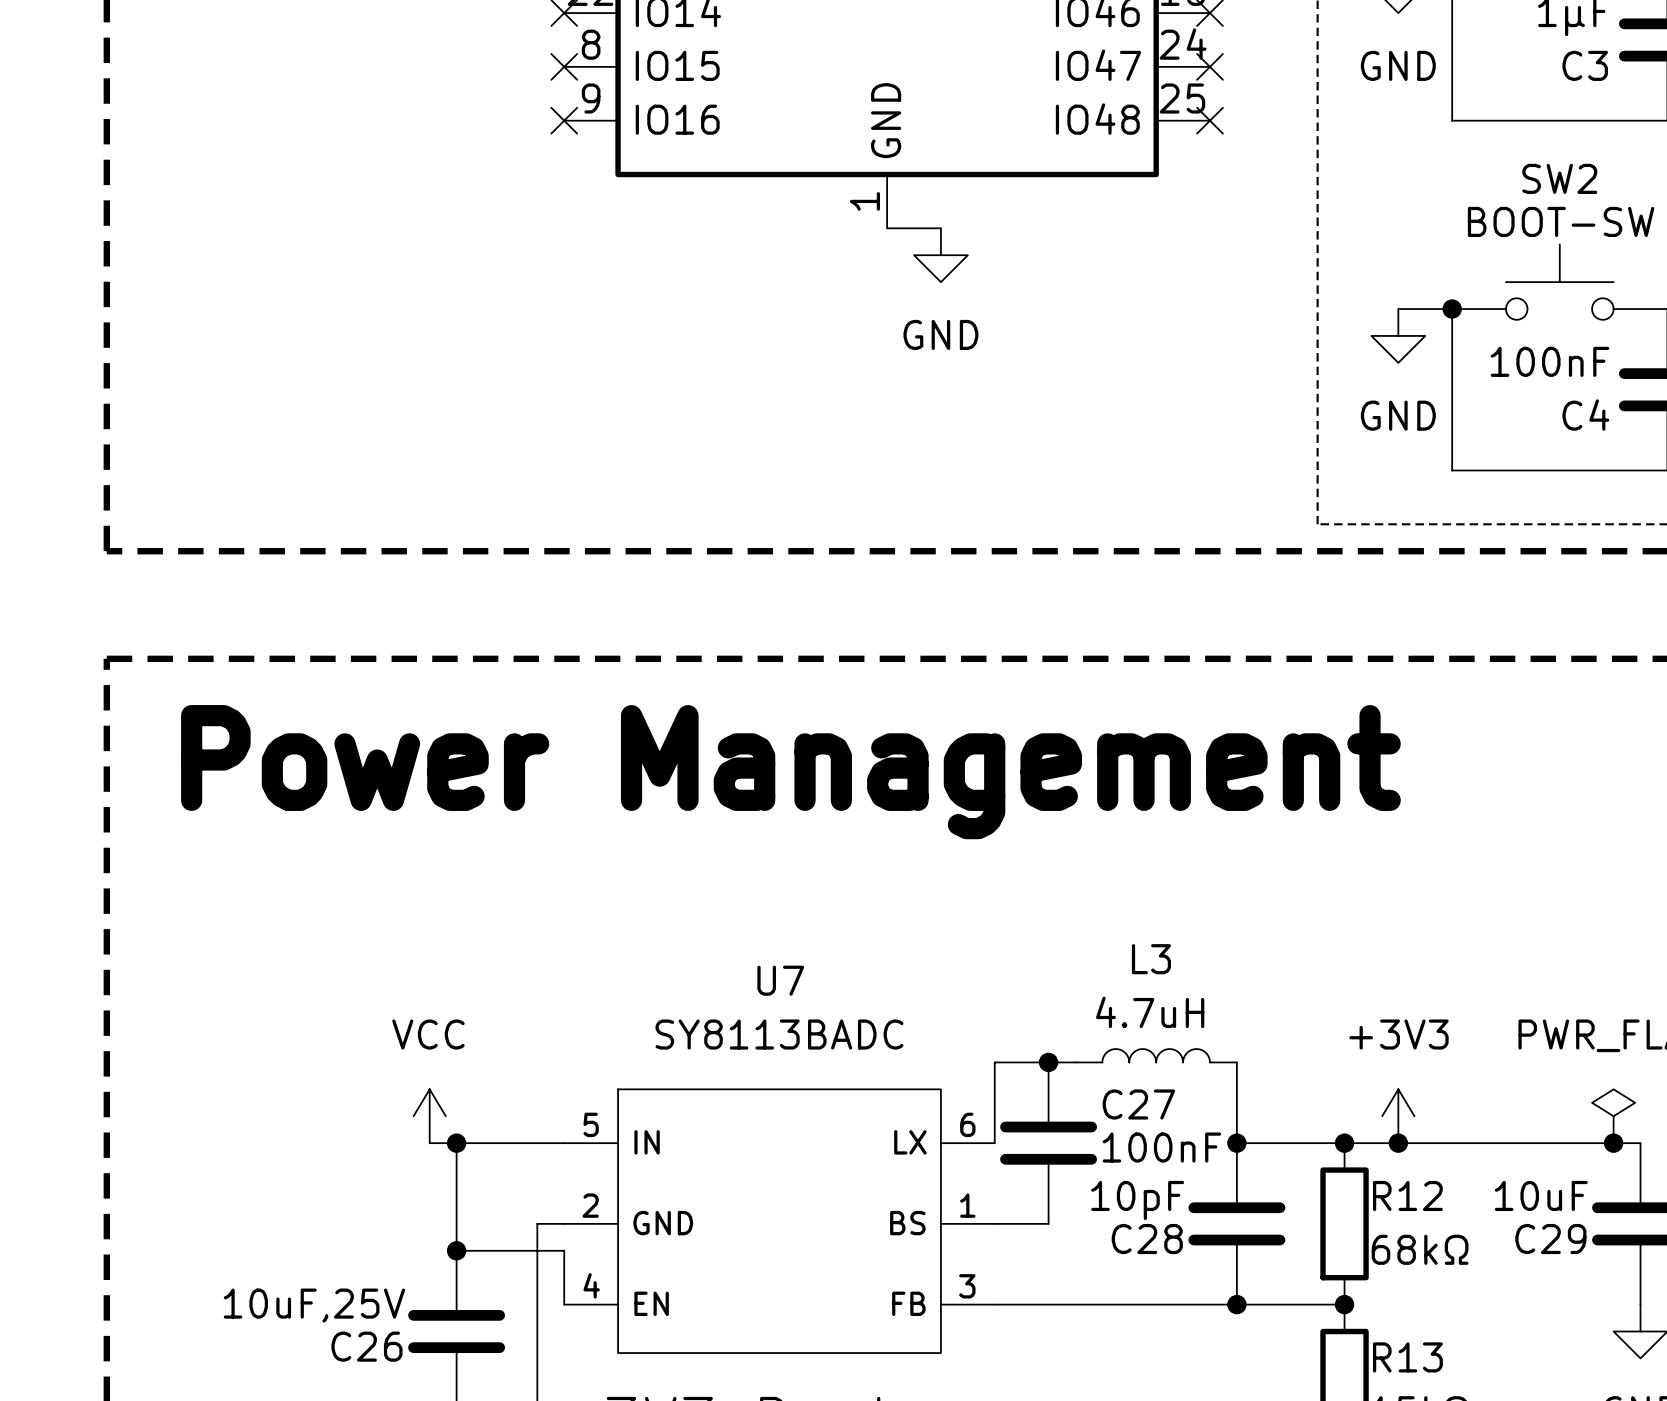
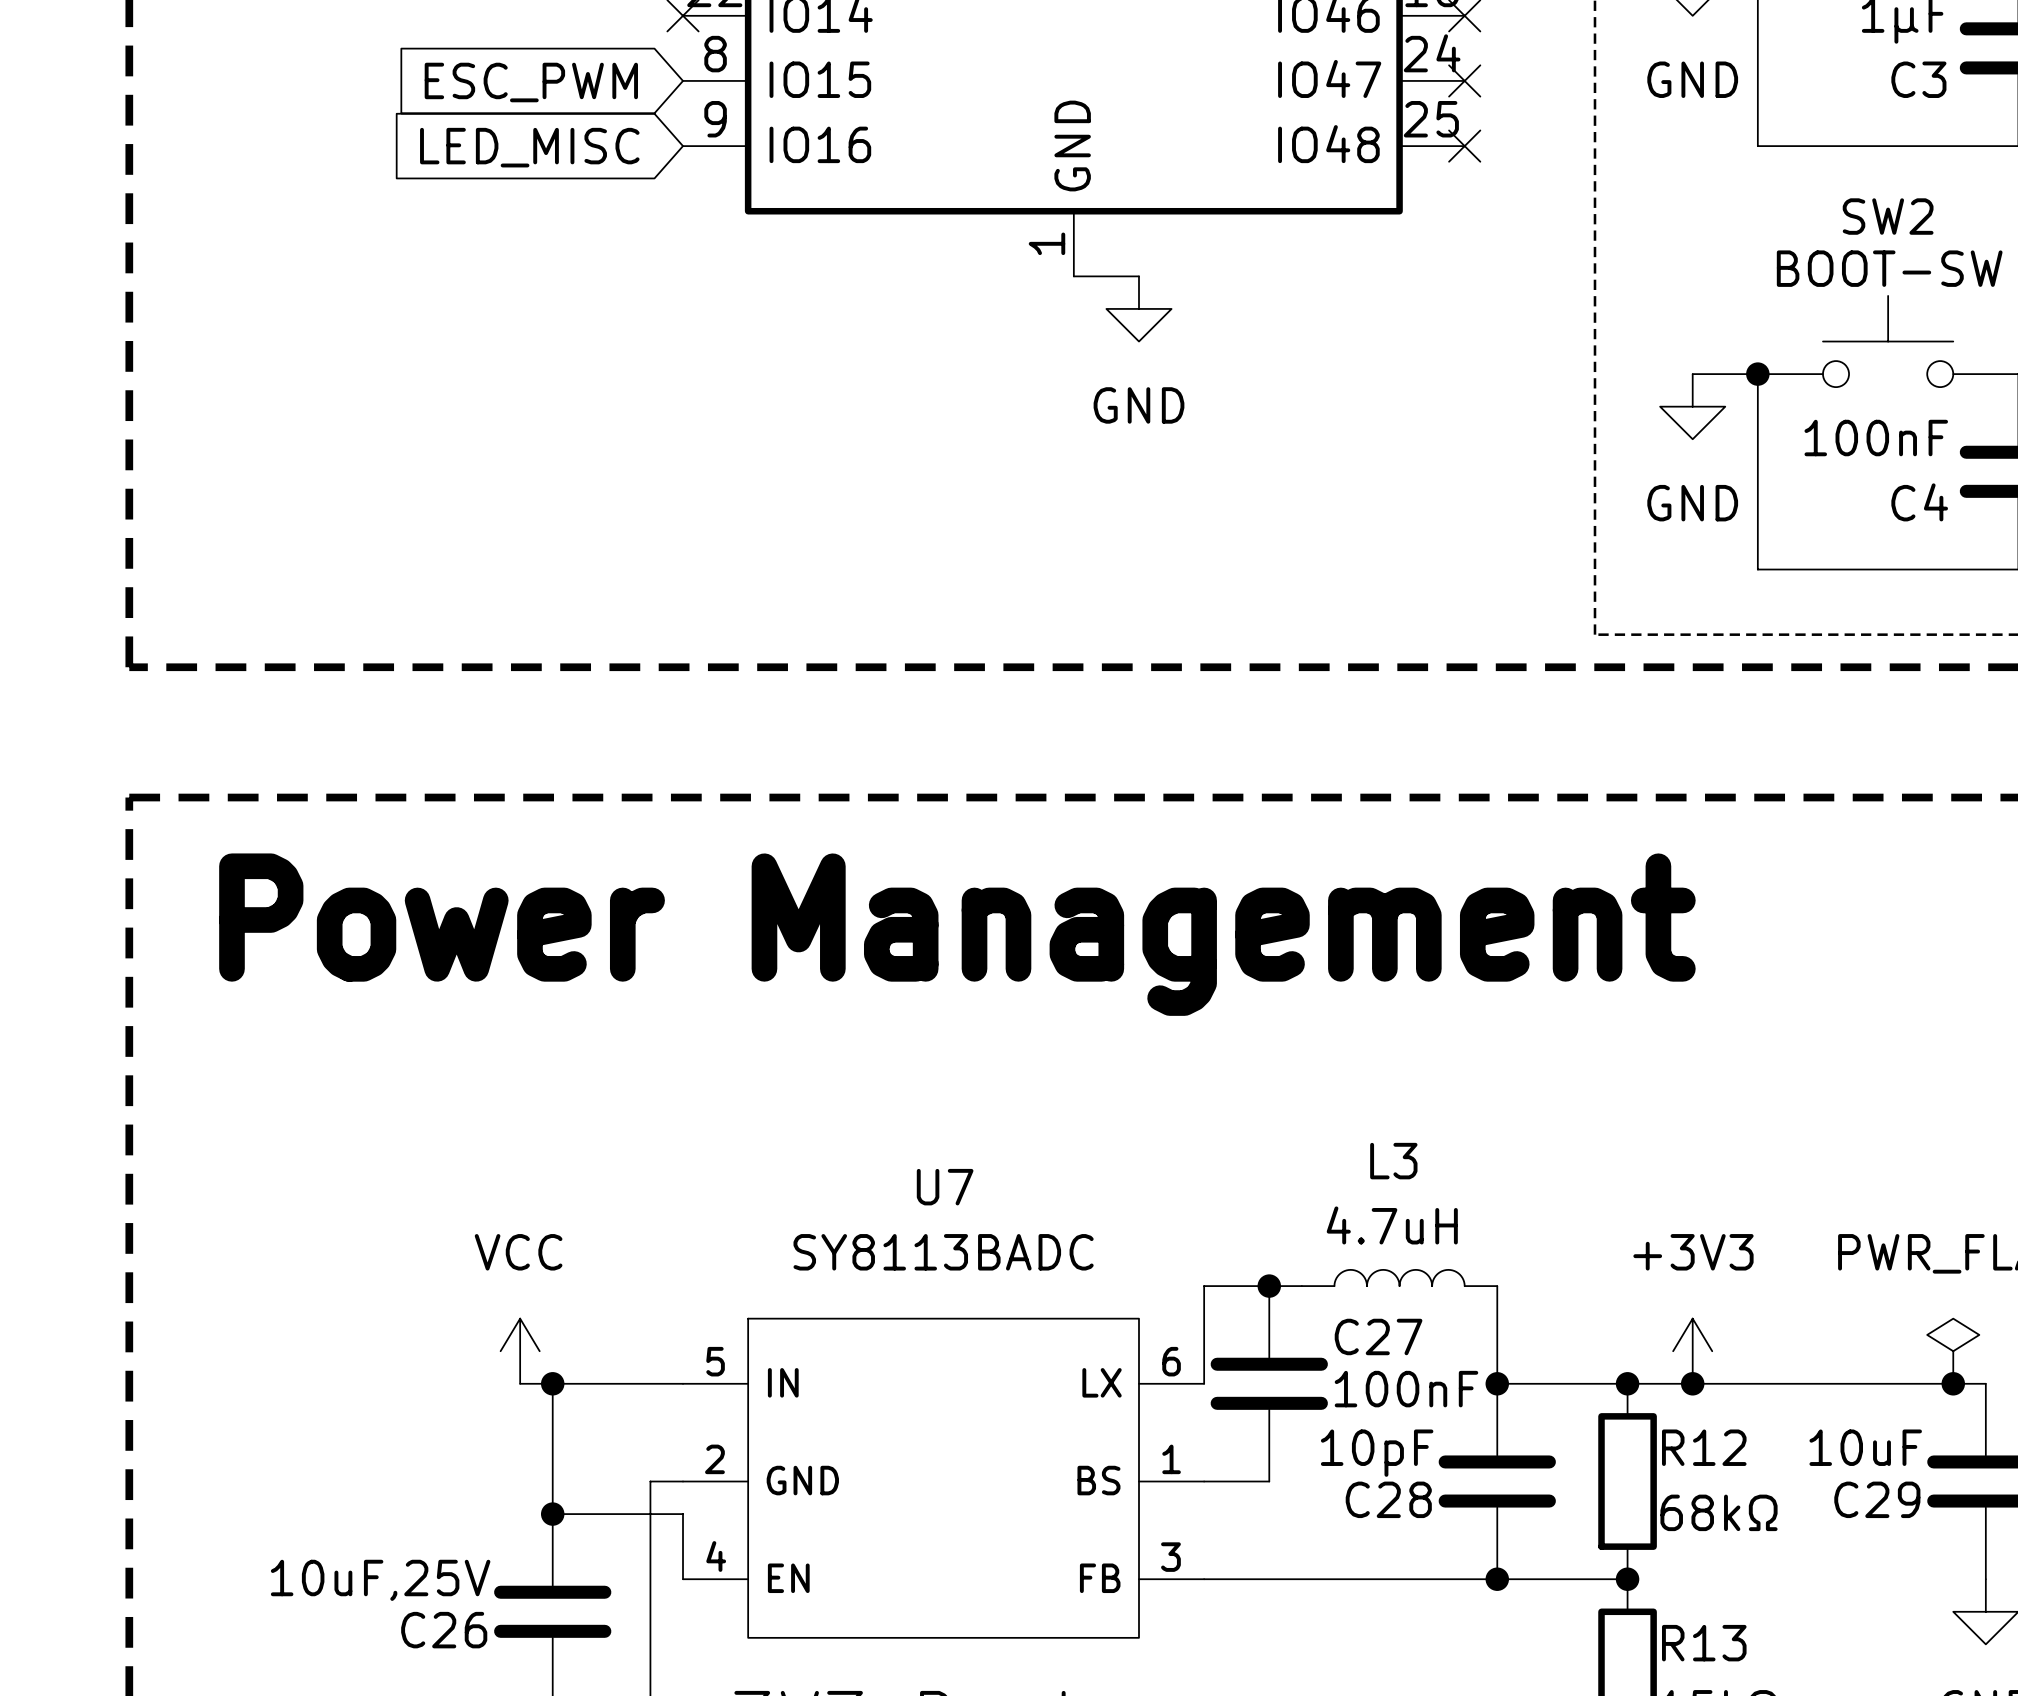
no-connect mark: (564, 66) -> none
global label: none -> ESC_PWM (531, 82)
no-connect mark: (564, 120) -> none
global label: none -> LED_MISC (529, 147)

